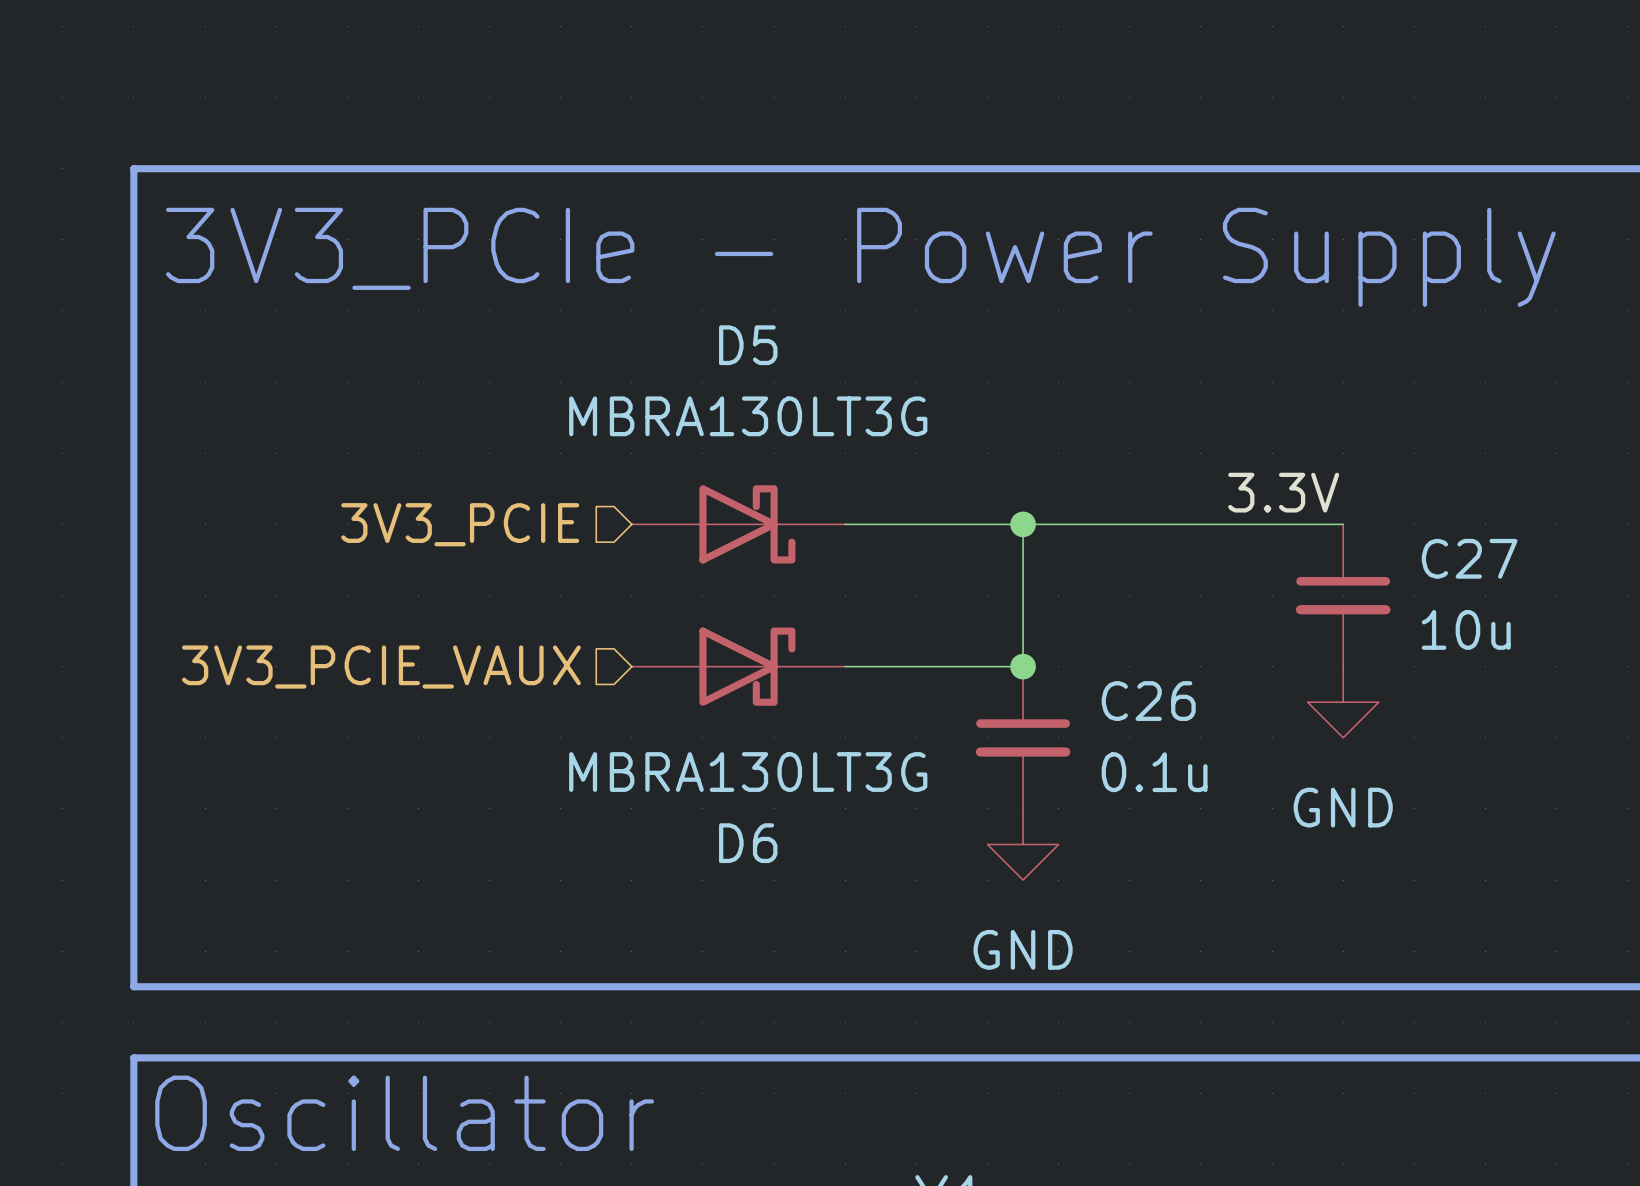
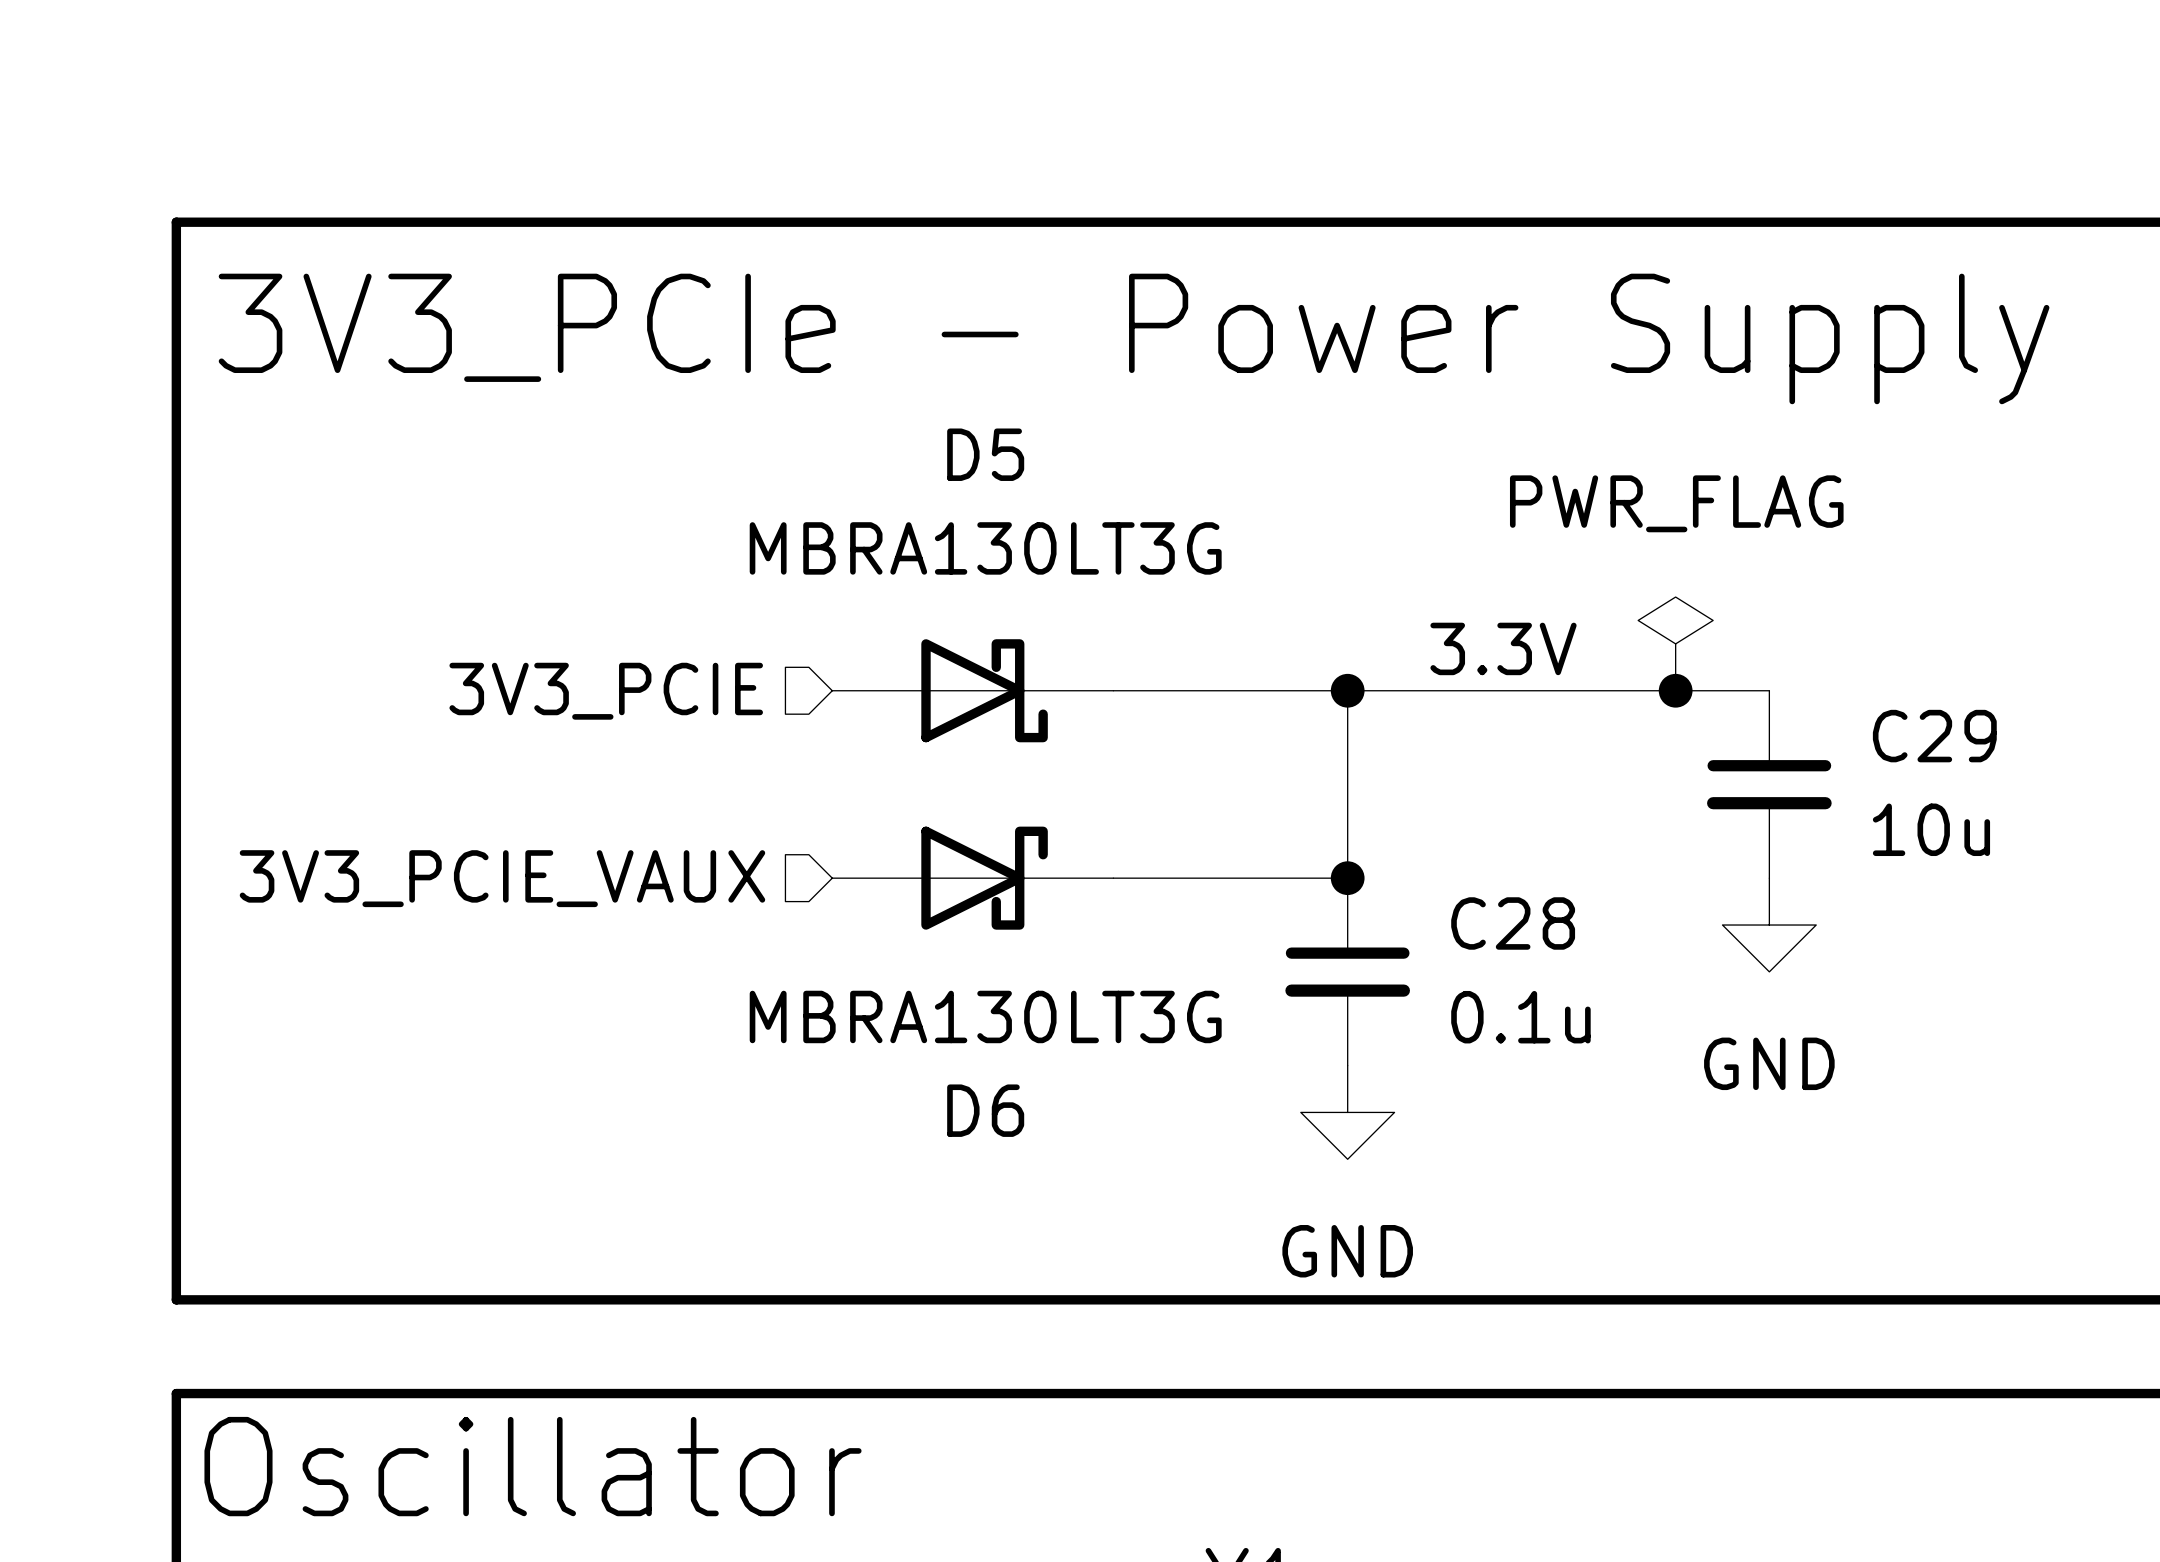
power symbol: none -> PWR_FLAG (1675, 643)
label position: 3.3V (1283, 492) -> 3.3V (1503, 648)
junction: none -> (1675, 690)
C27 name: C27 (1469, 558) -> C29 (1934, 736)
C26 name: C26 (1148, 701) -> C28 (1513, 923)

